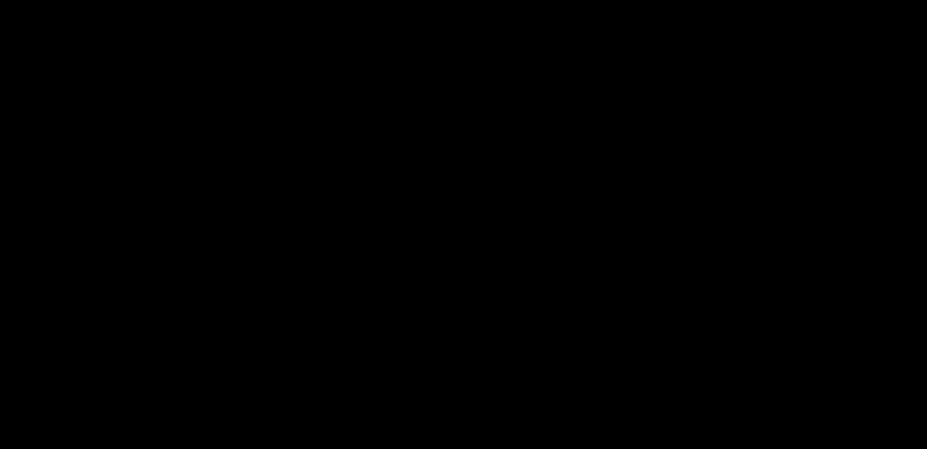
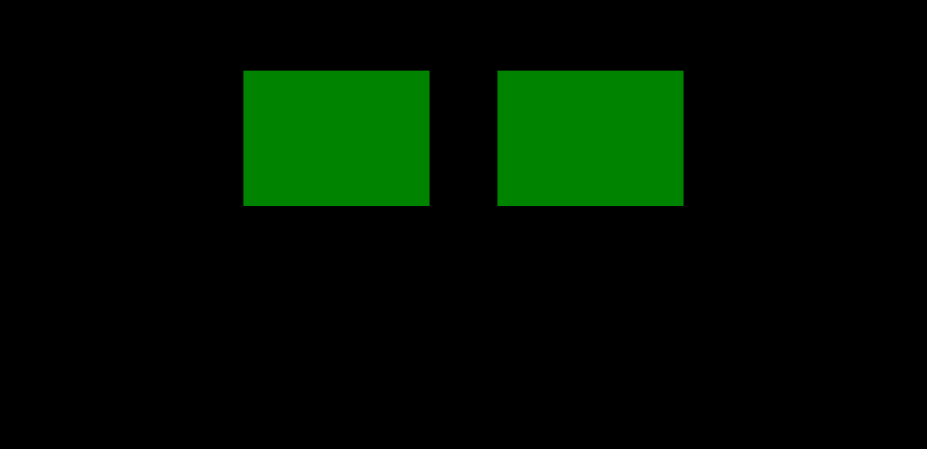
part: none -> (463, 138)

